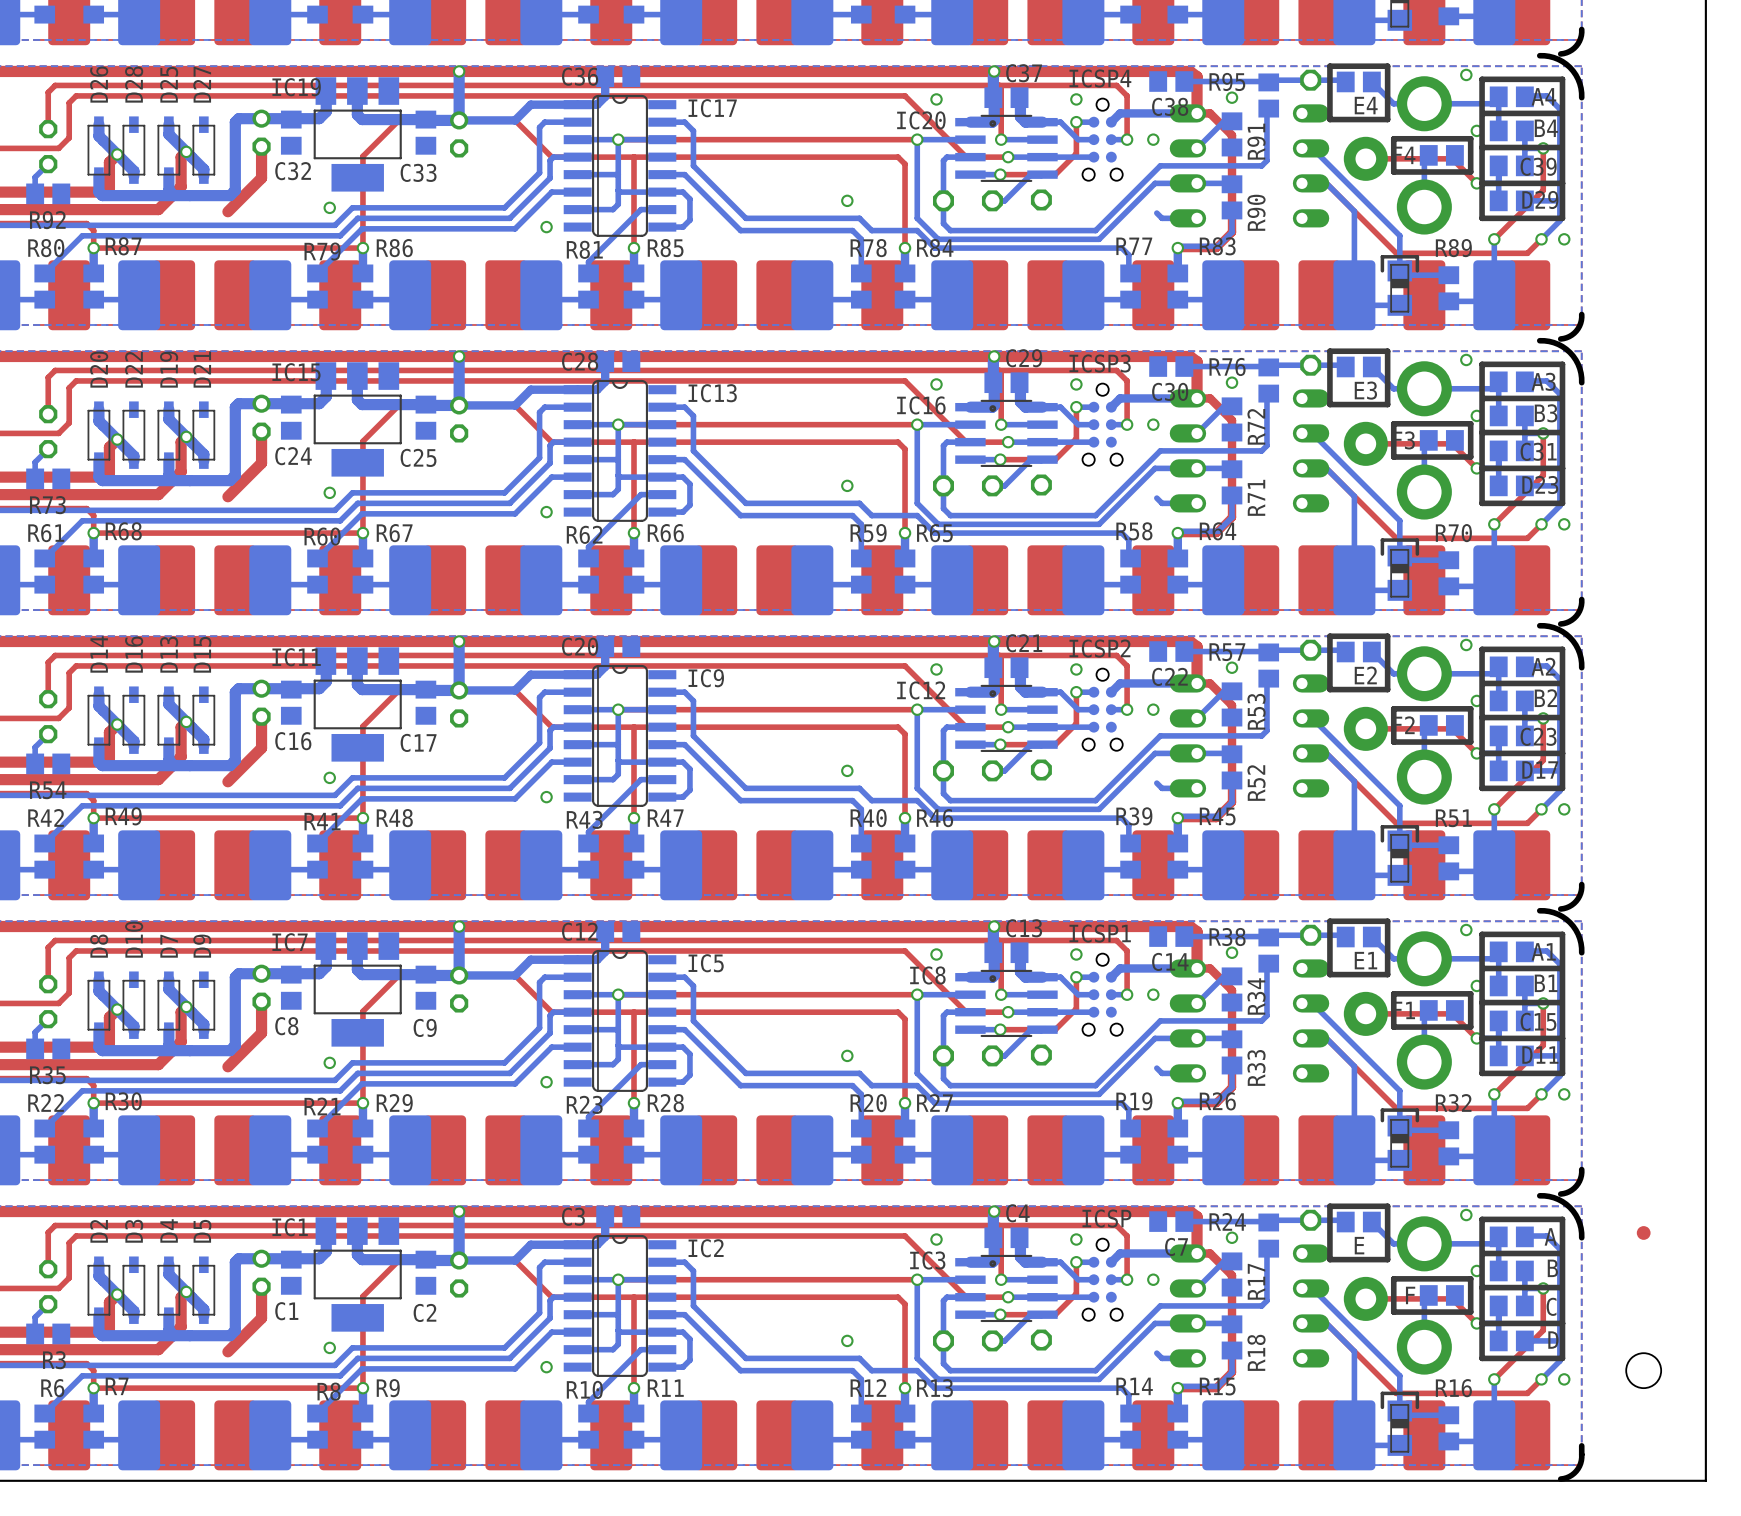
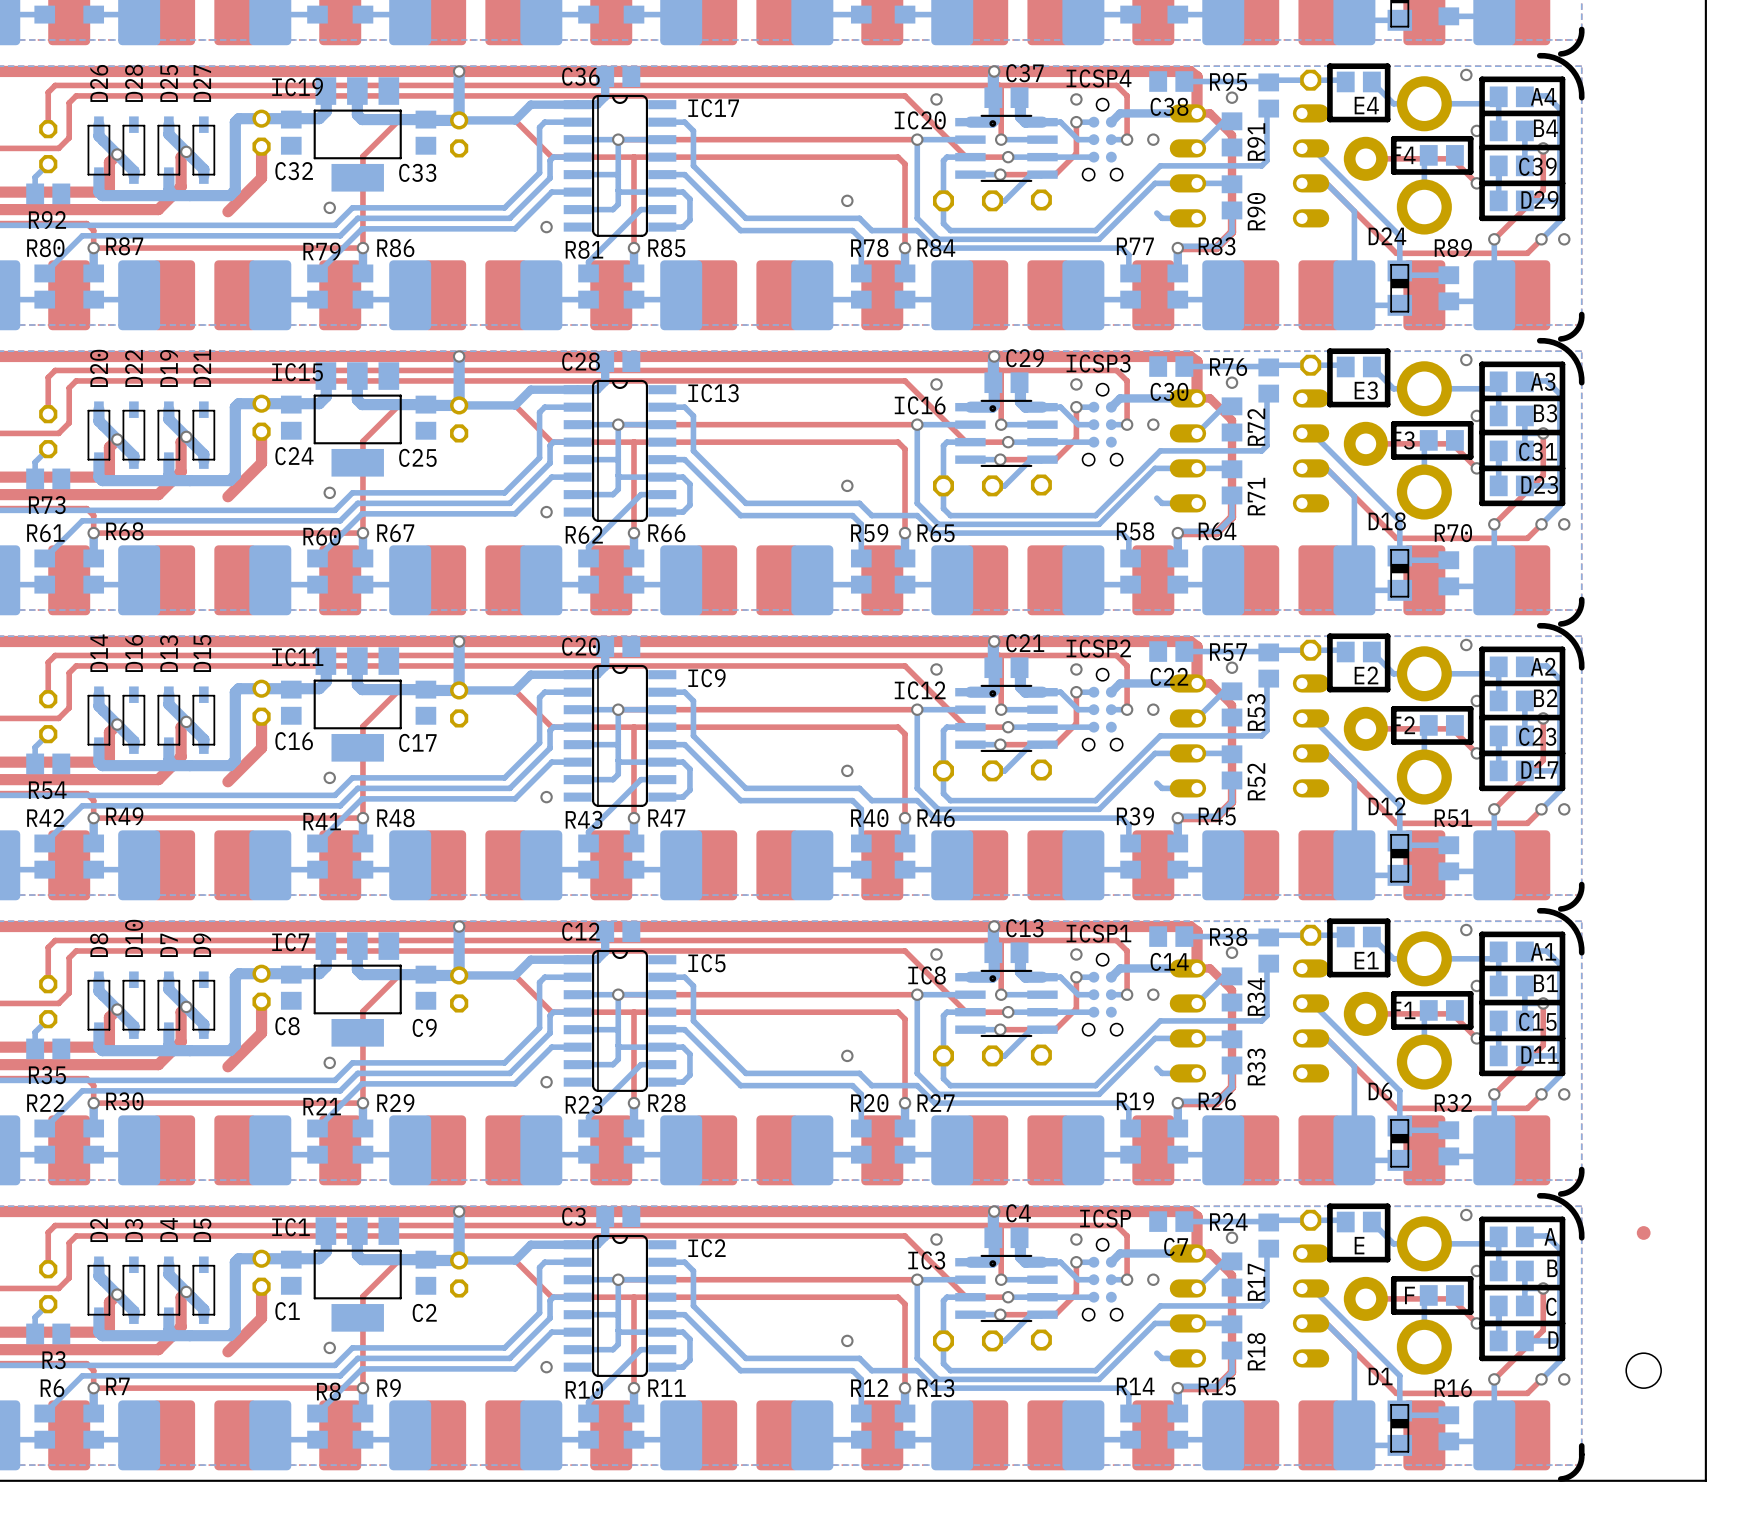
D24 name: none -> D24 (1387, 236)
line: (1417, 270) (1417, 256) (1382, 256) (1382, 270) -> none
D18 name: none -> D18 (1387, 521)
line: (1417, 554) (1417, 540) (1382, 540) (1382, 554) -> none
D12 name: none -> D12 (1387, 806)
line: (1417, 840) (1417, 826) (1382, 826) (1382, 840) -> none
D6 name: none -> D6 (1380, 1091)
line: (1417, 1120) (1417, 1110) (1382, 1110) (1382, 1120) -> none
D1 name: none -> D1 (1380, 1376)
line: (1417, 1407) (1417, 1393) (1382, 1393) (1382, 1407) -> none

